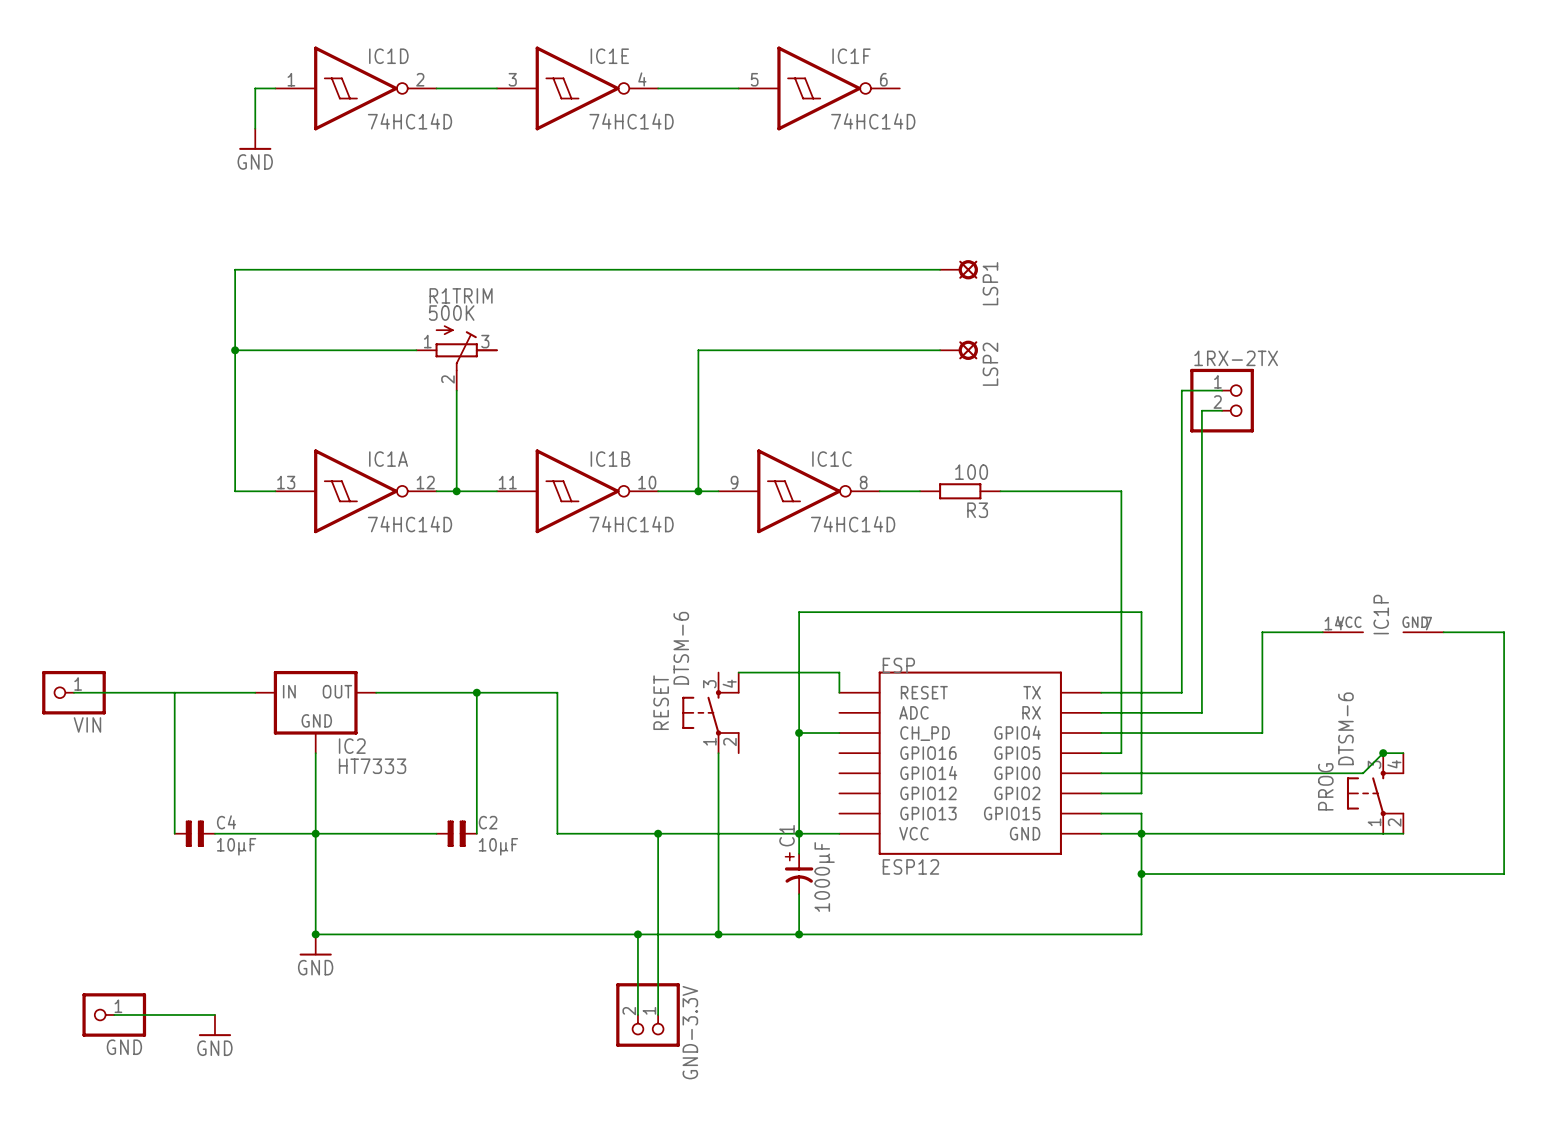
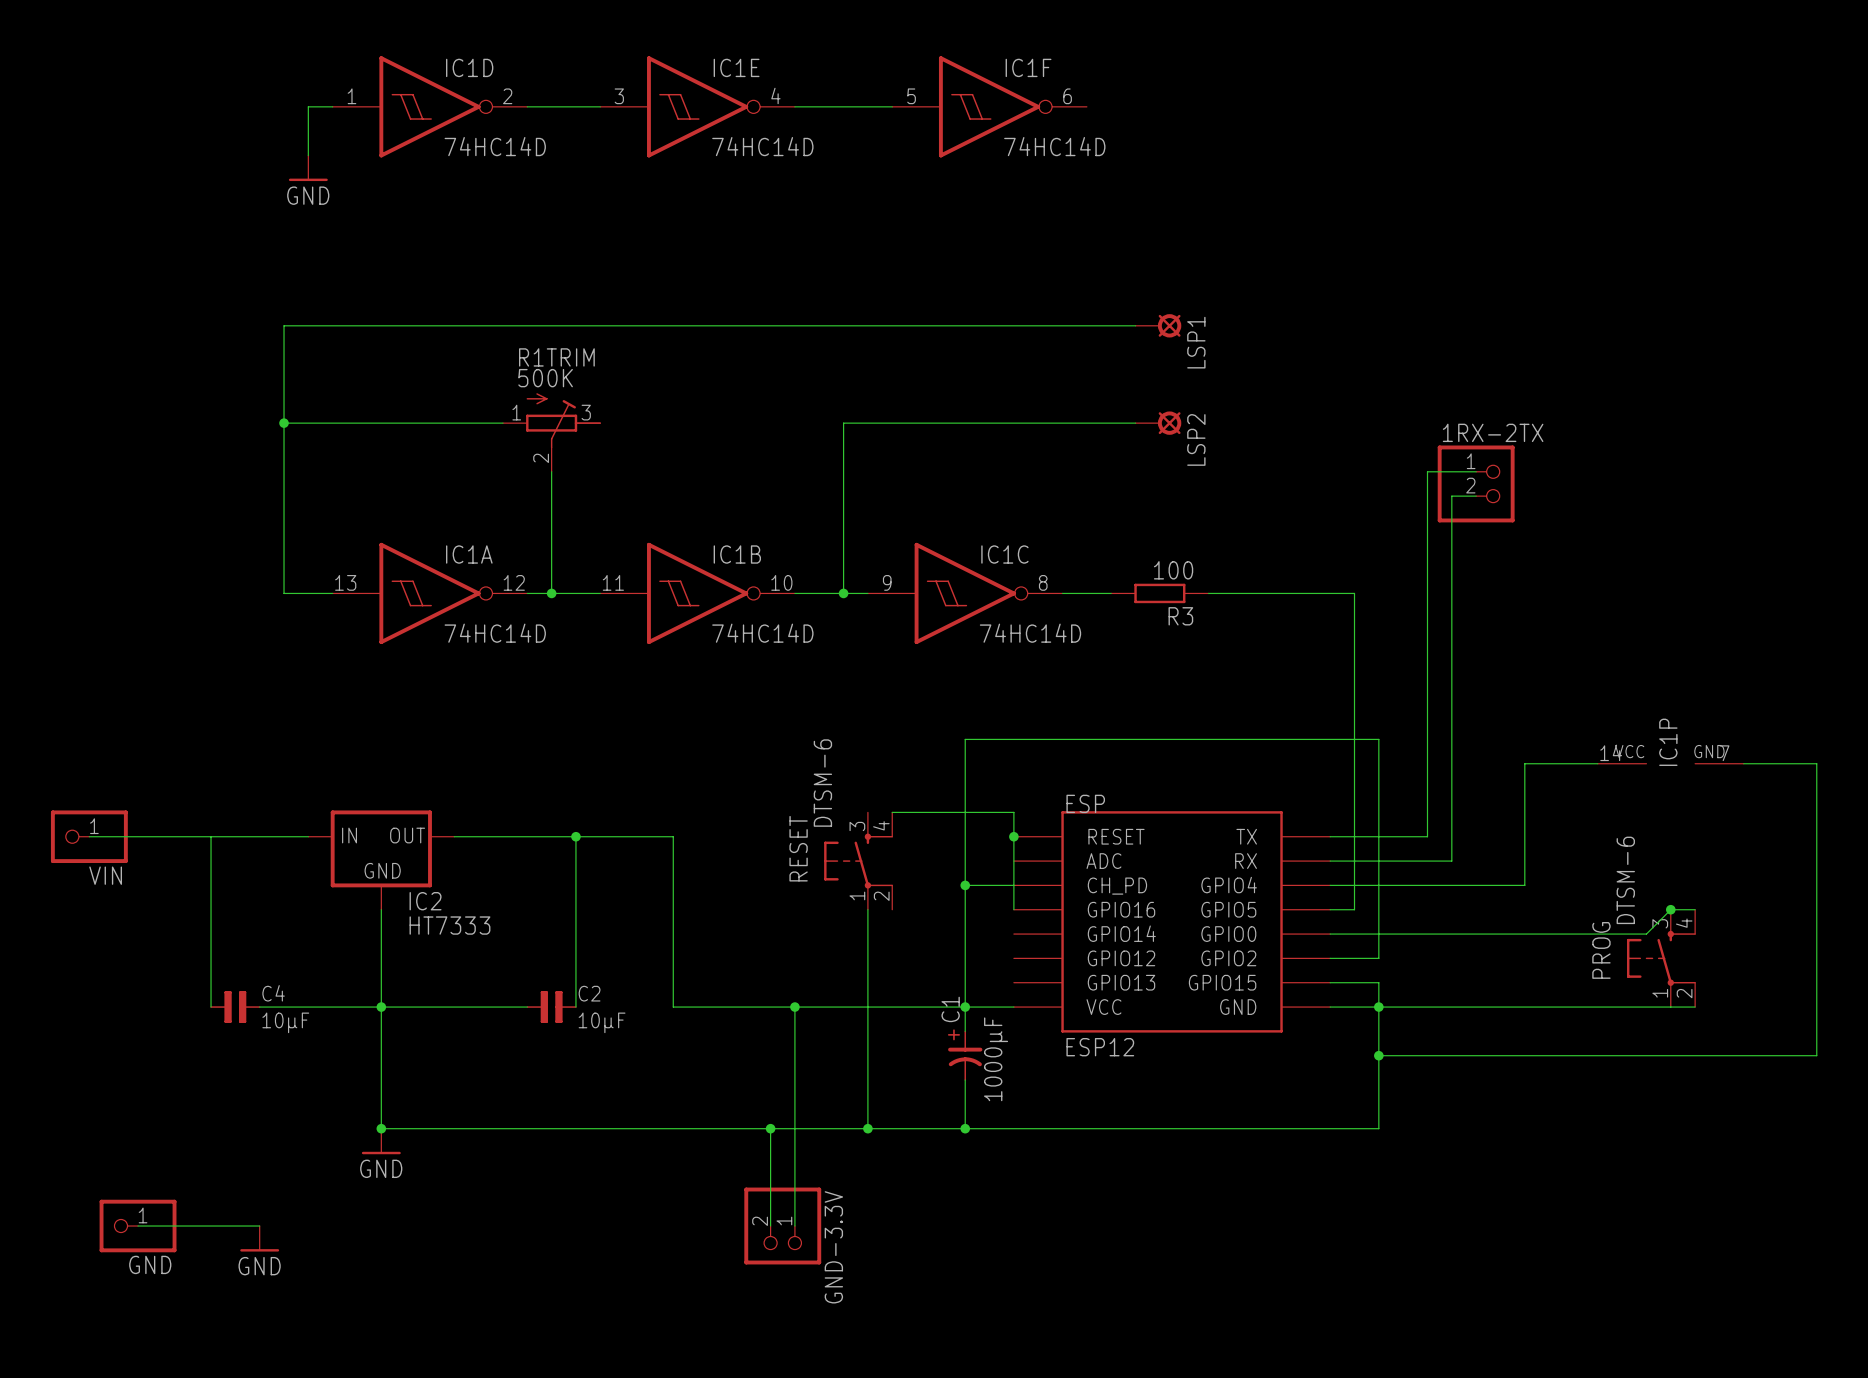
wire: none -> (1013, 836) (1013, 909)
junction: none -> (1013, 836)

